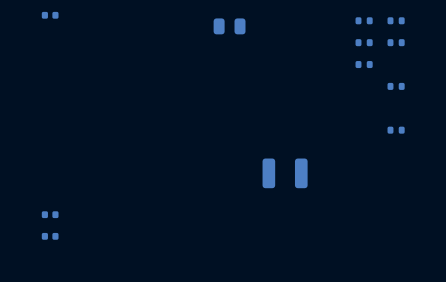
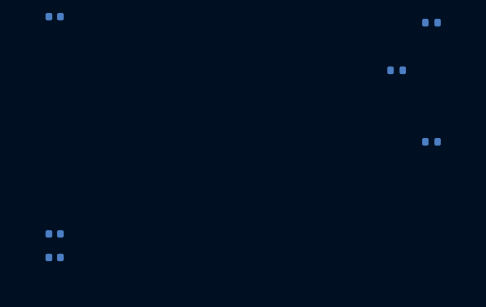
part: (364, 20) -> none
part: (229, 26) -> none
part: (364, 42) -> none
part: (396, 42) -> none
part: (396, 86) -> none
part: (285, 173) -> none

